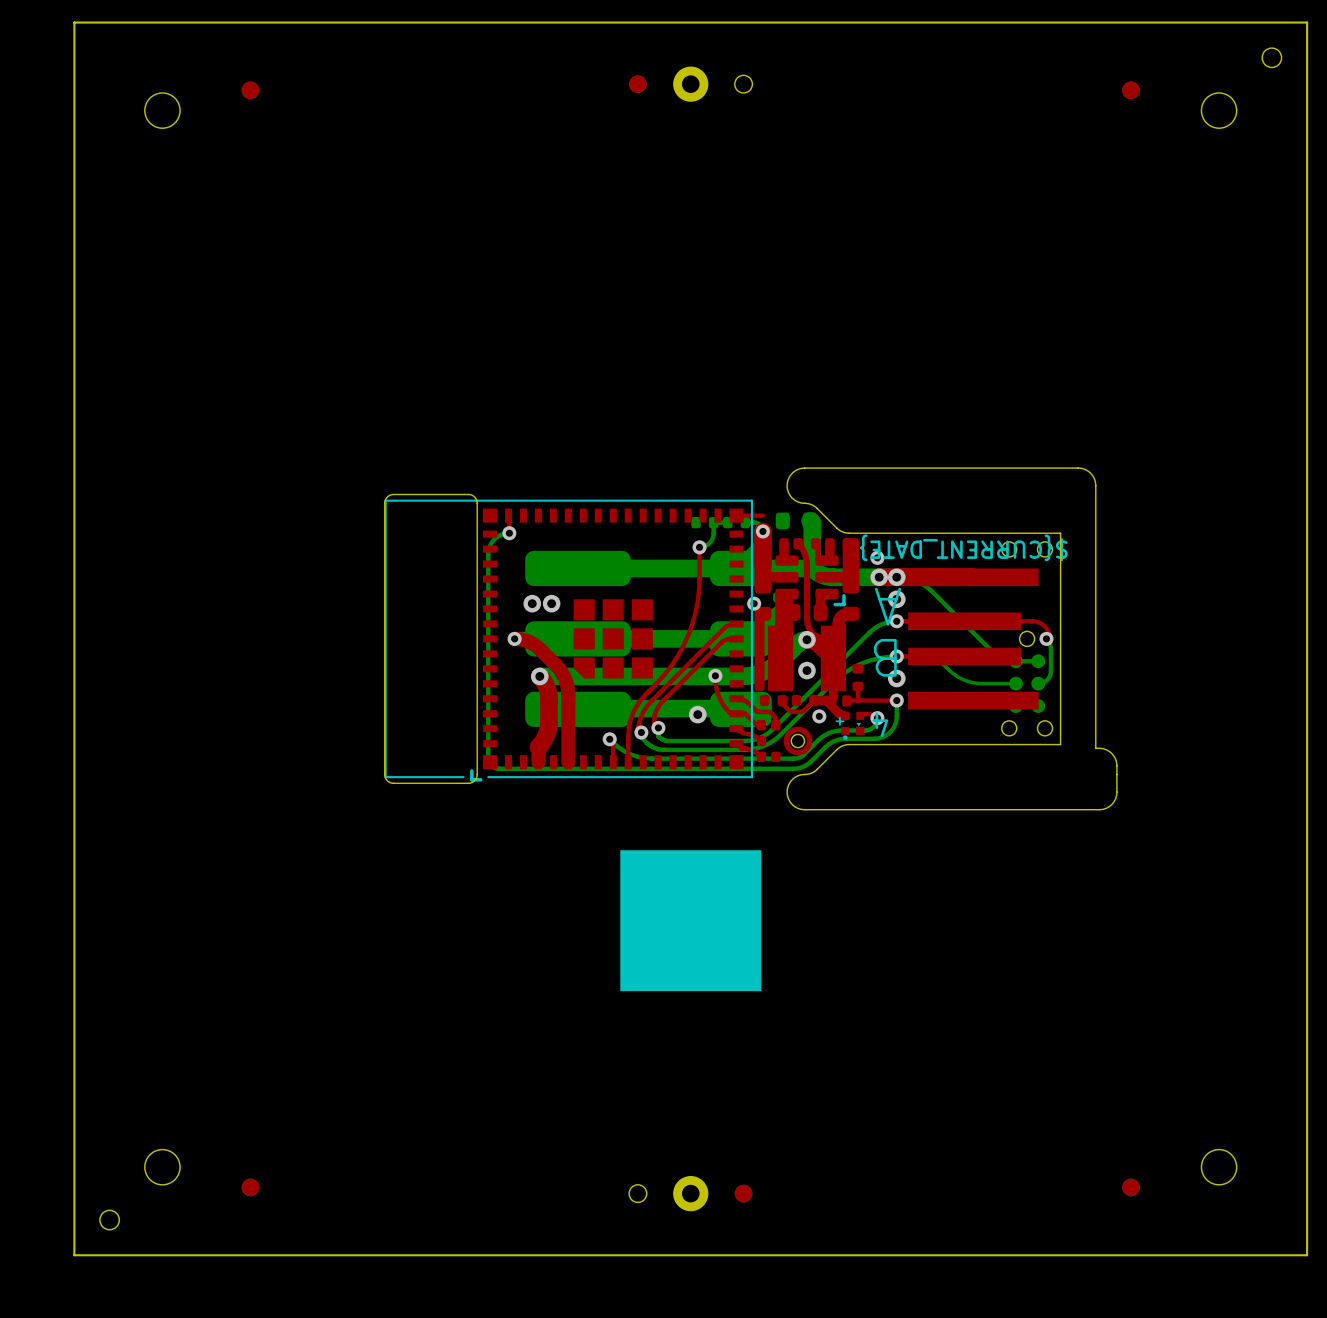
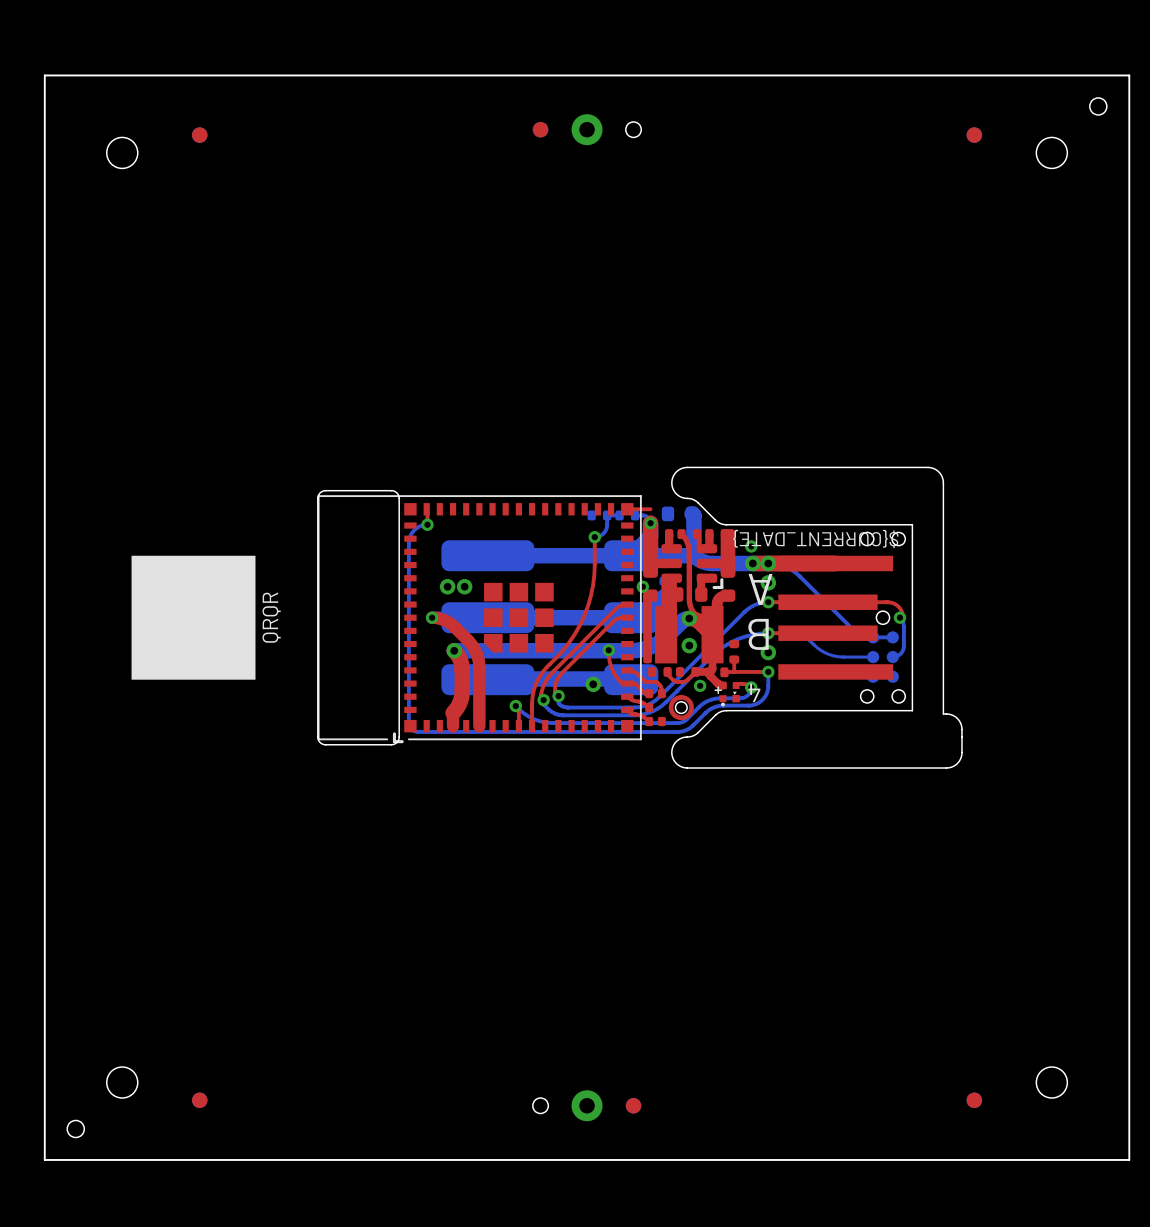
drawing: none -> [131, 555, 256, 680]
text: none -> QRQR (271, 617)
drawing: [620, 850, 762, 992] -> none

